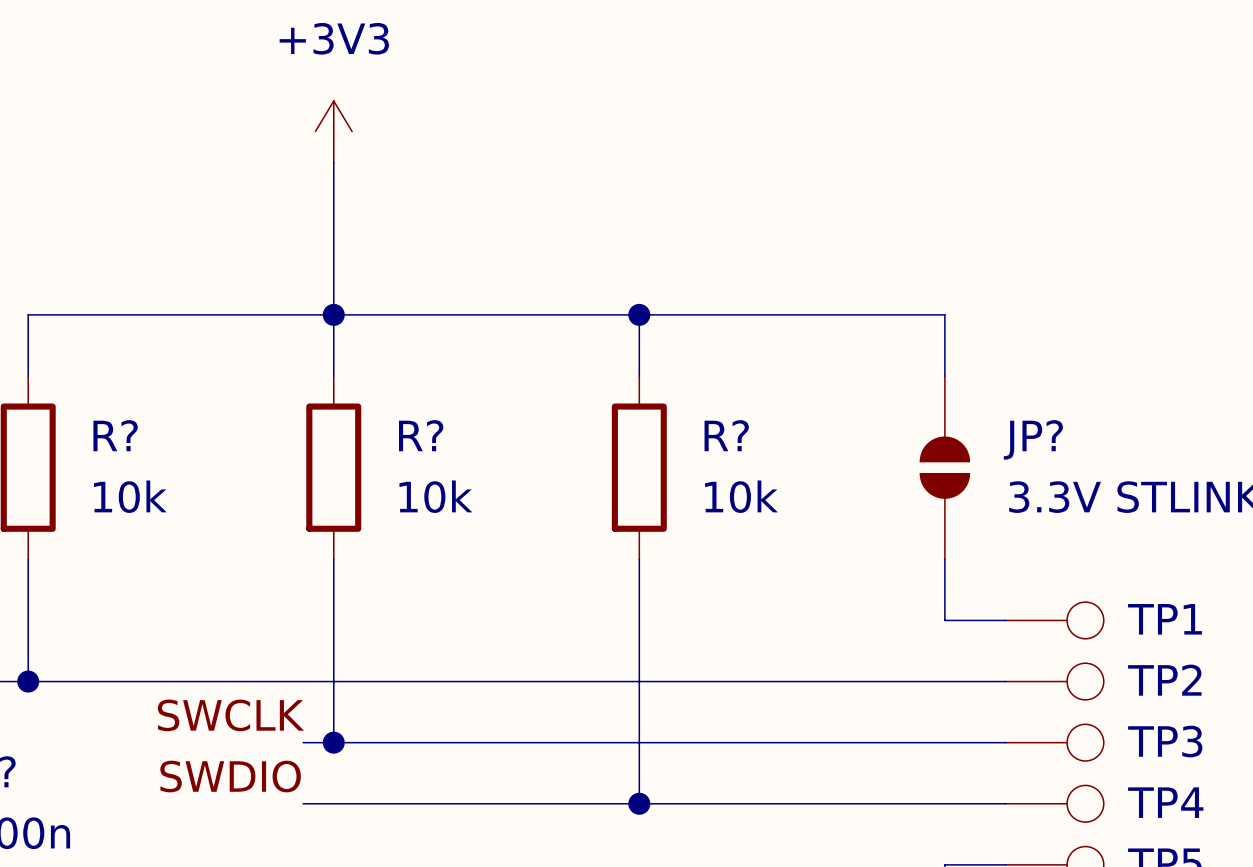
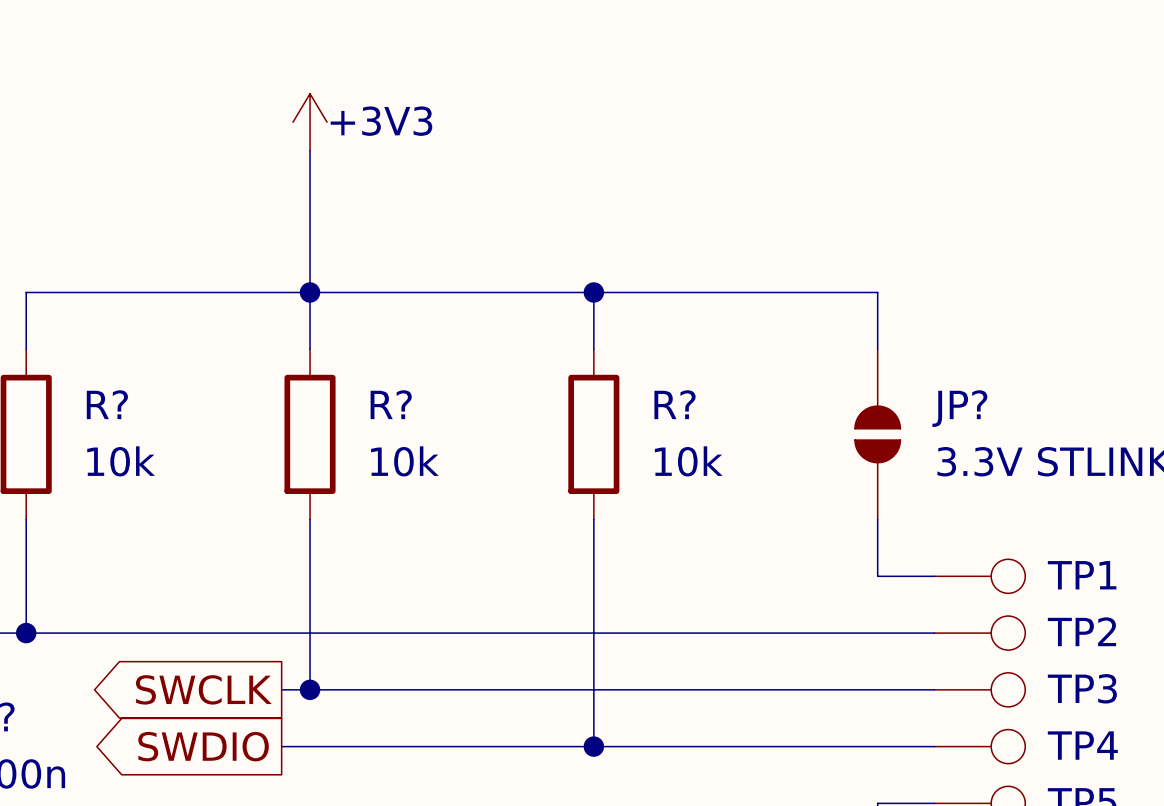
power symbol text position: +3V3 (334, 38) -> +3V3 (381, 121)
label: SWCLK (230, 715) -> none
global label: none -> SWCLK (203, 689)
label: SWDIO (230, 776) -> none
global label: none -> SWDIO (203, 746)

